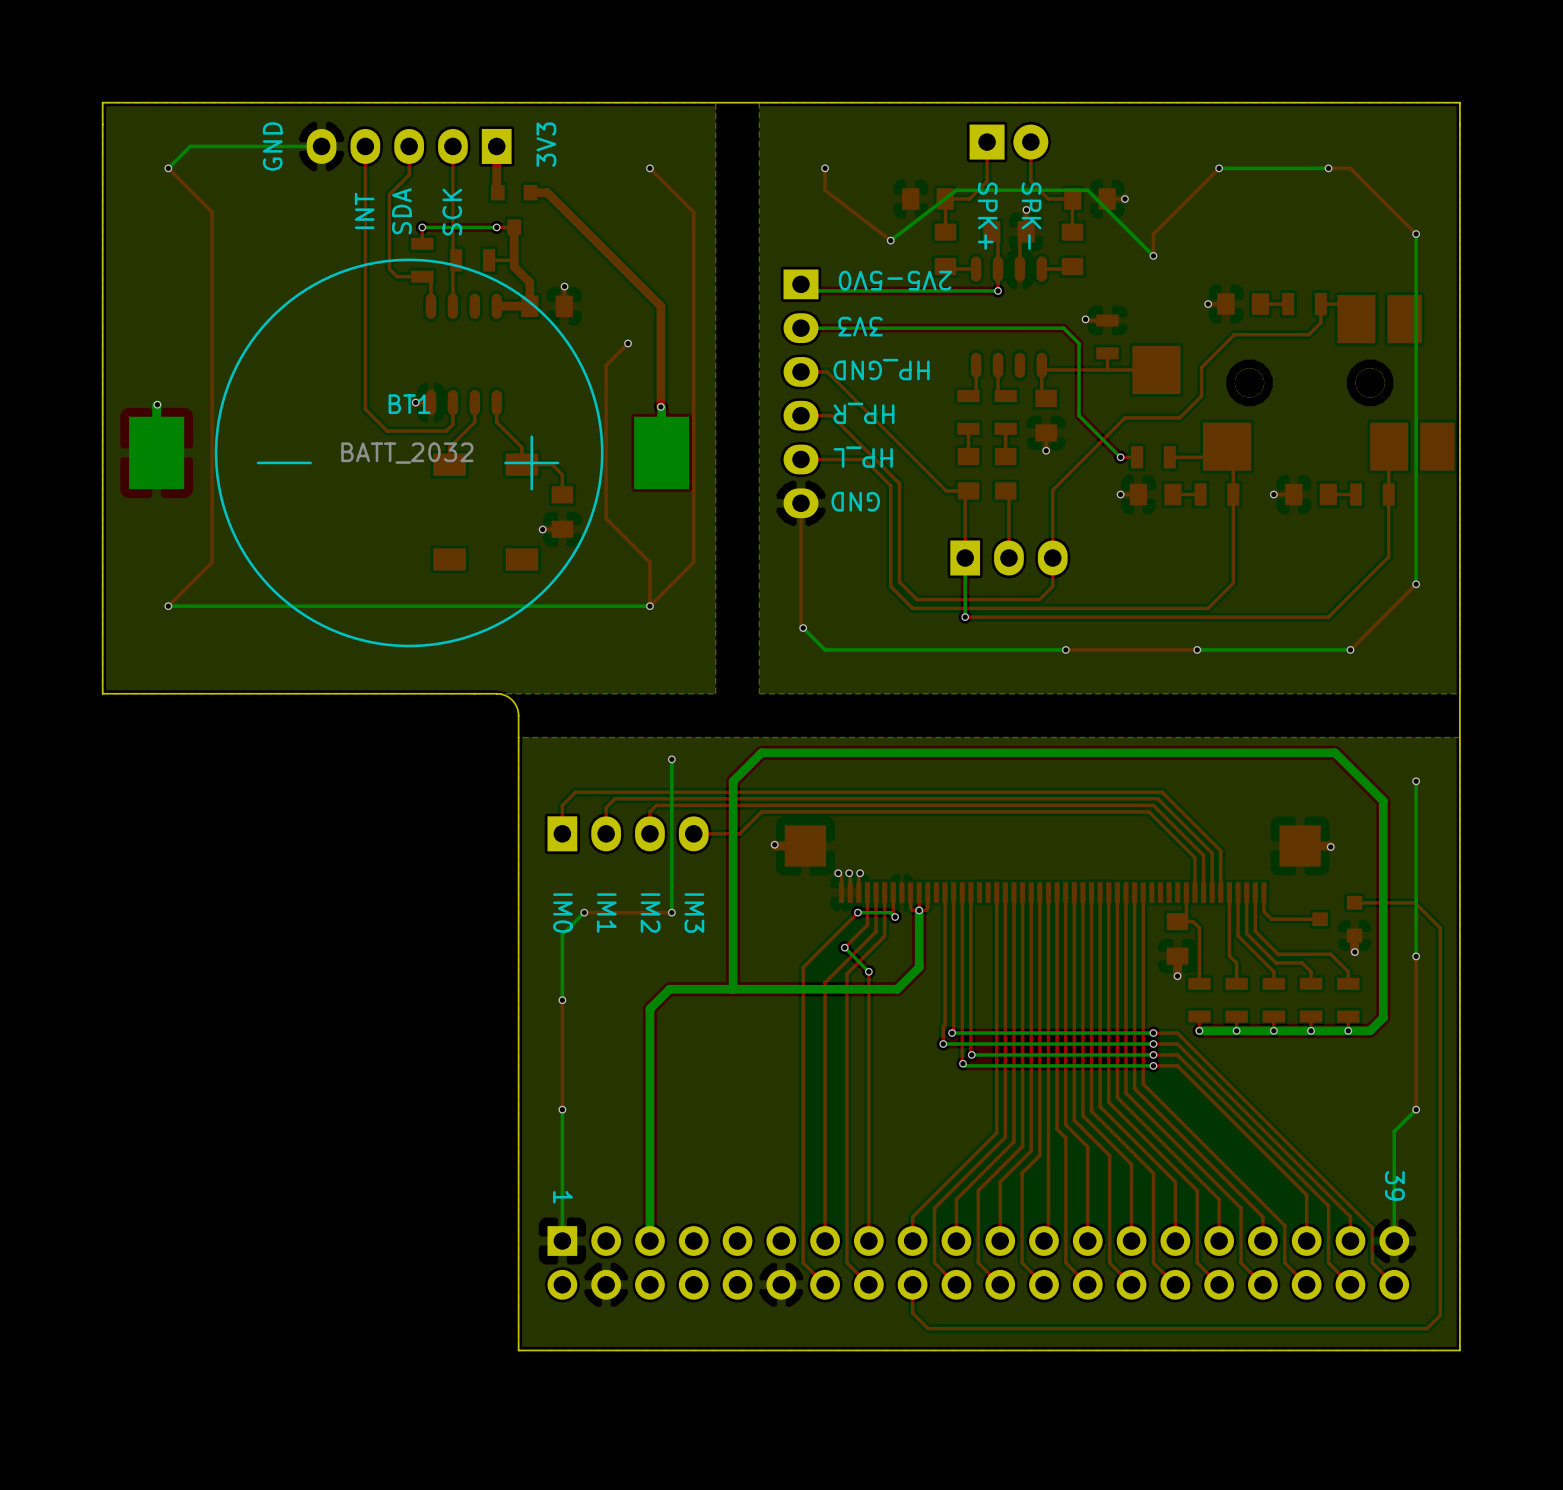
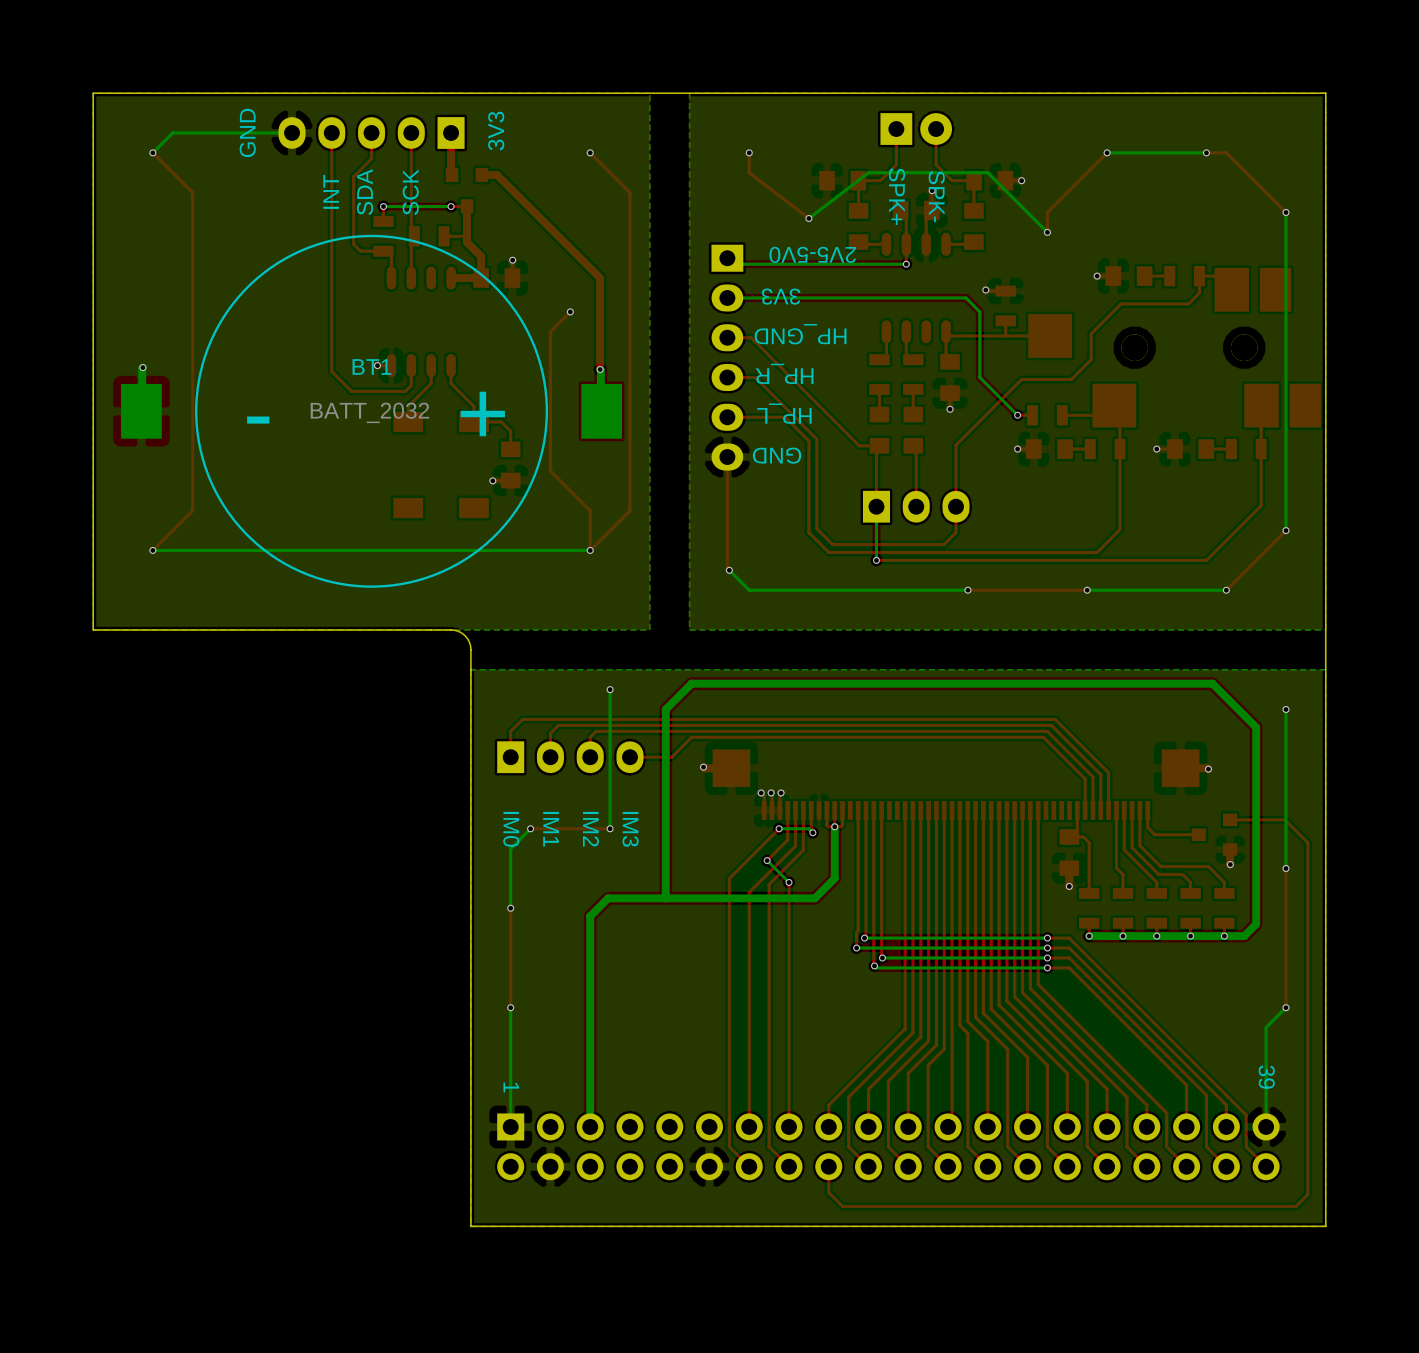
BT1 footprint: [129, 258, 690, 648] -> [121, 234, 622, 588]

